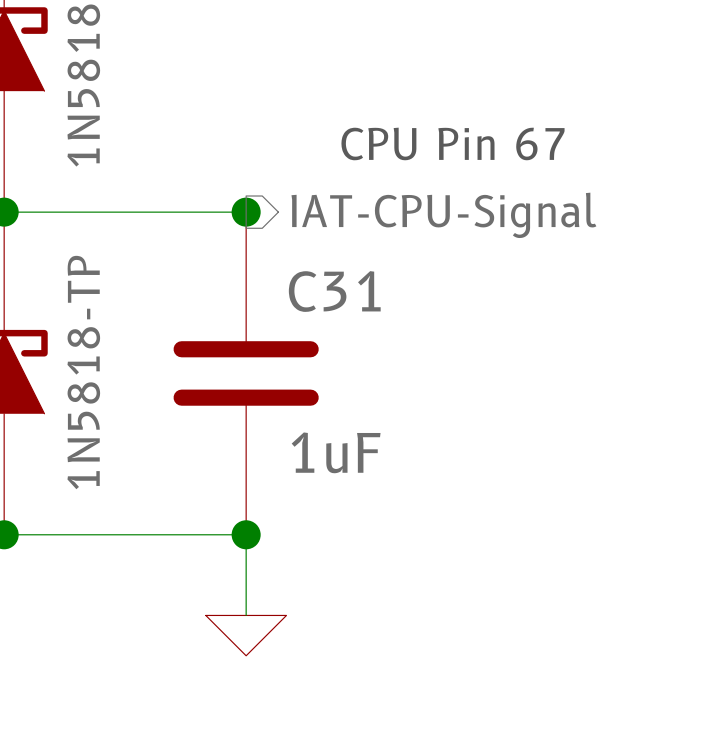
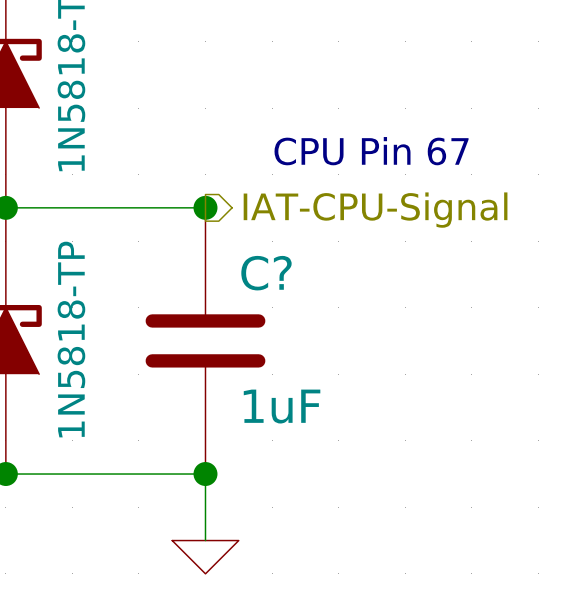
C31 name: C31 (334, 291) -> C? (266, 273)

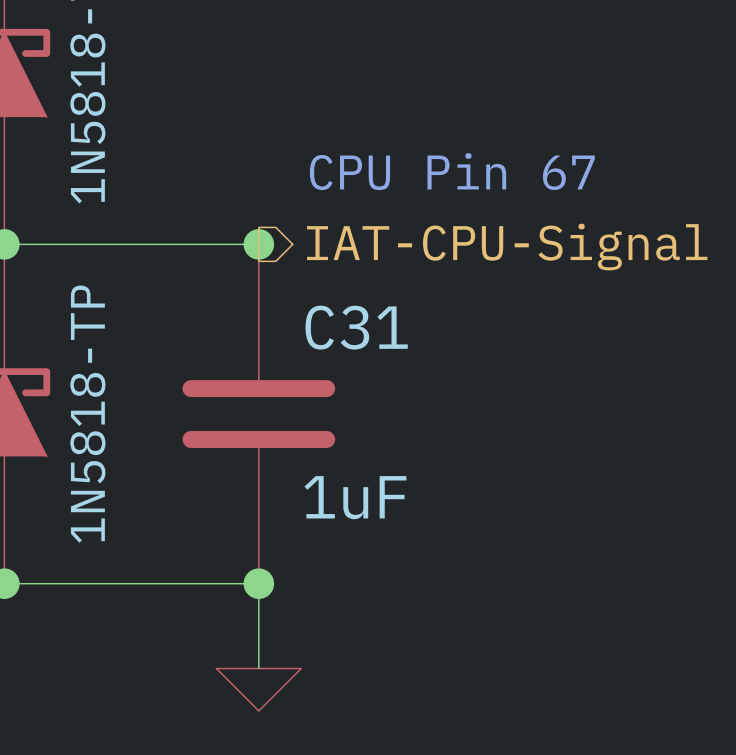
C? name: C? (266, 273) -> C31 (356, 327)

